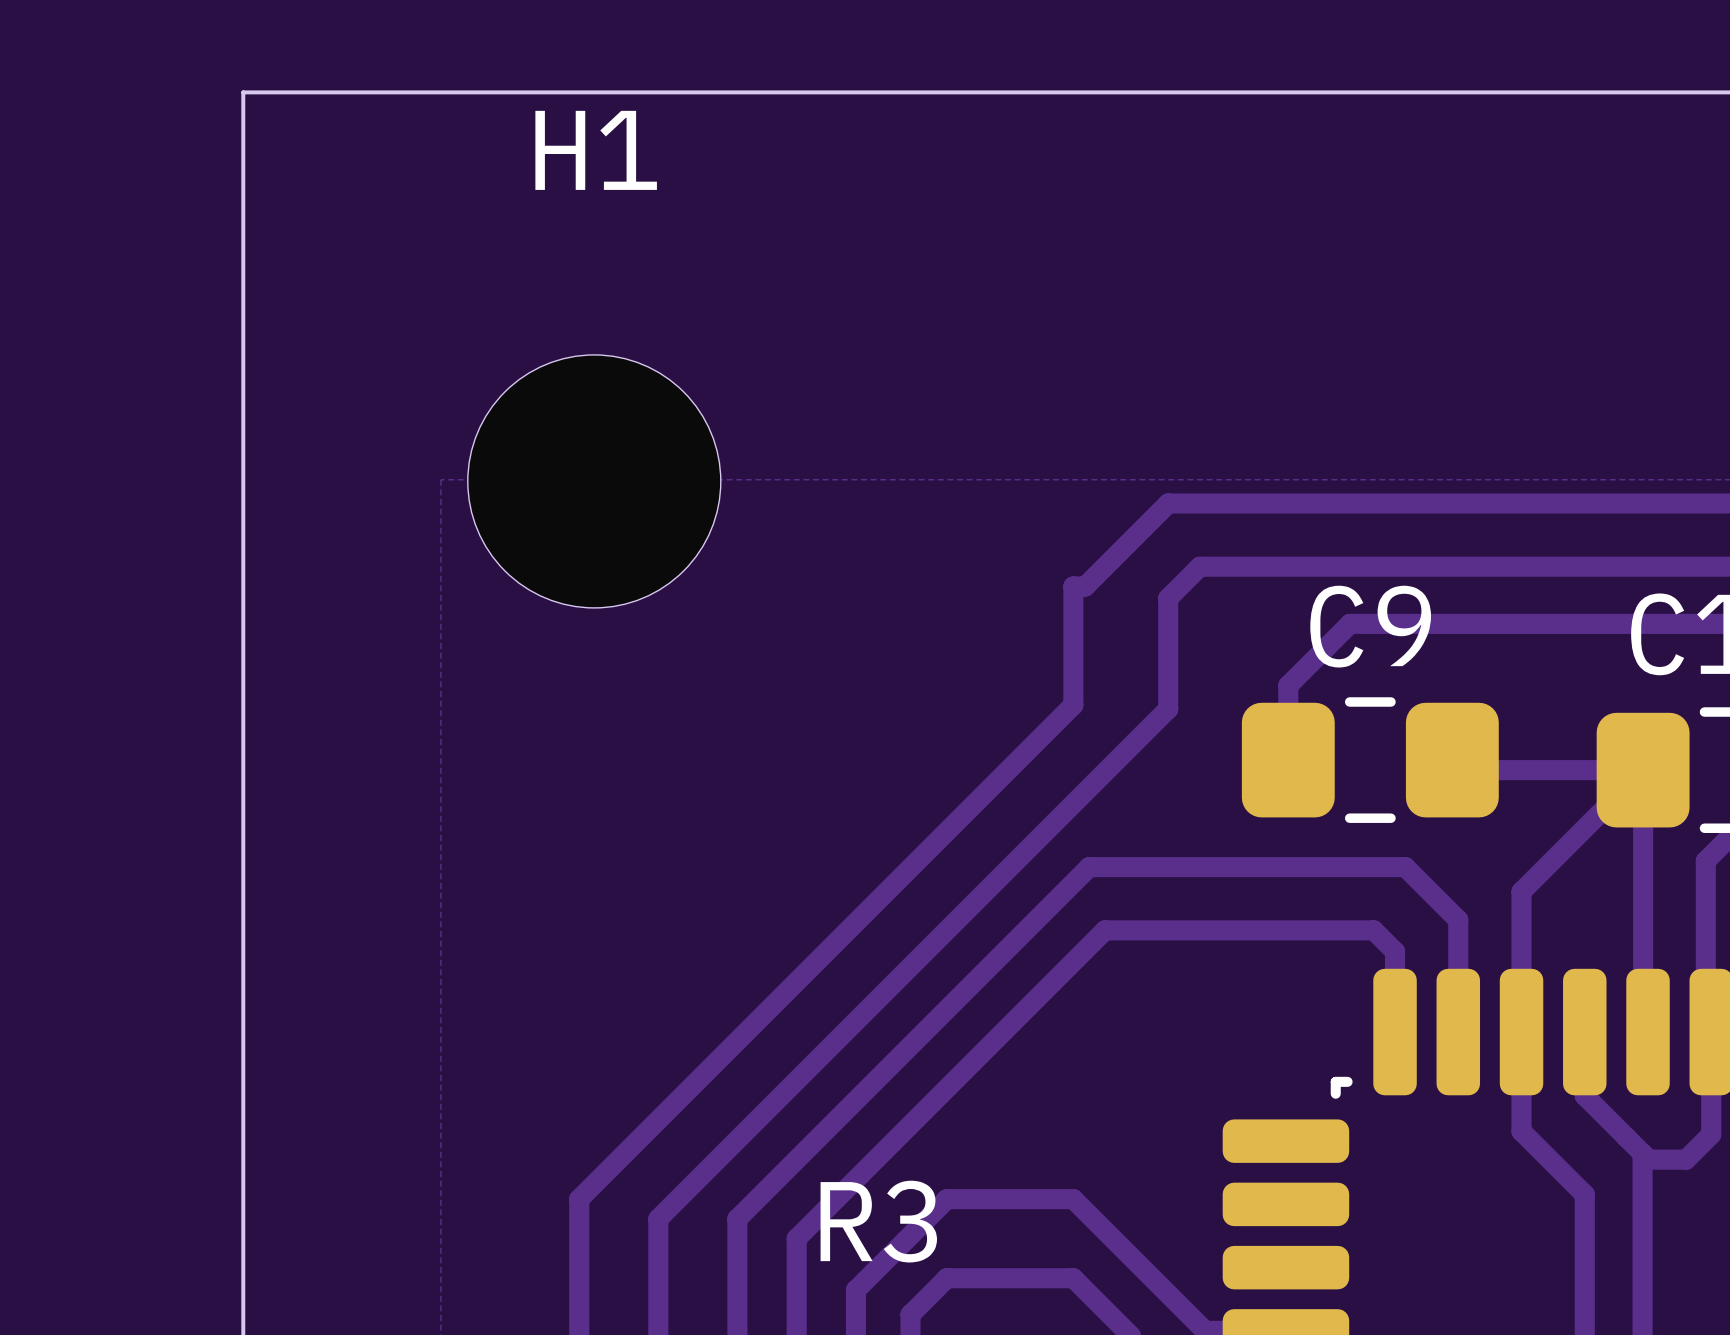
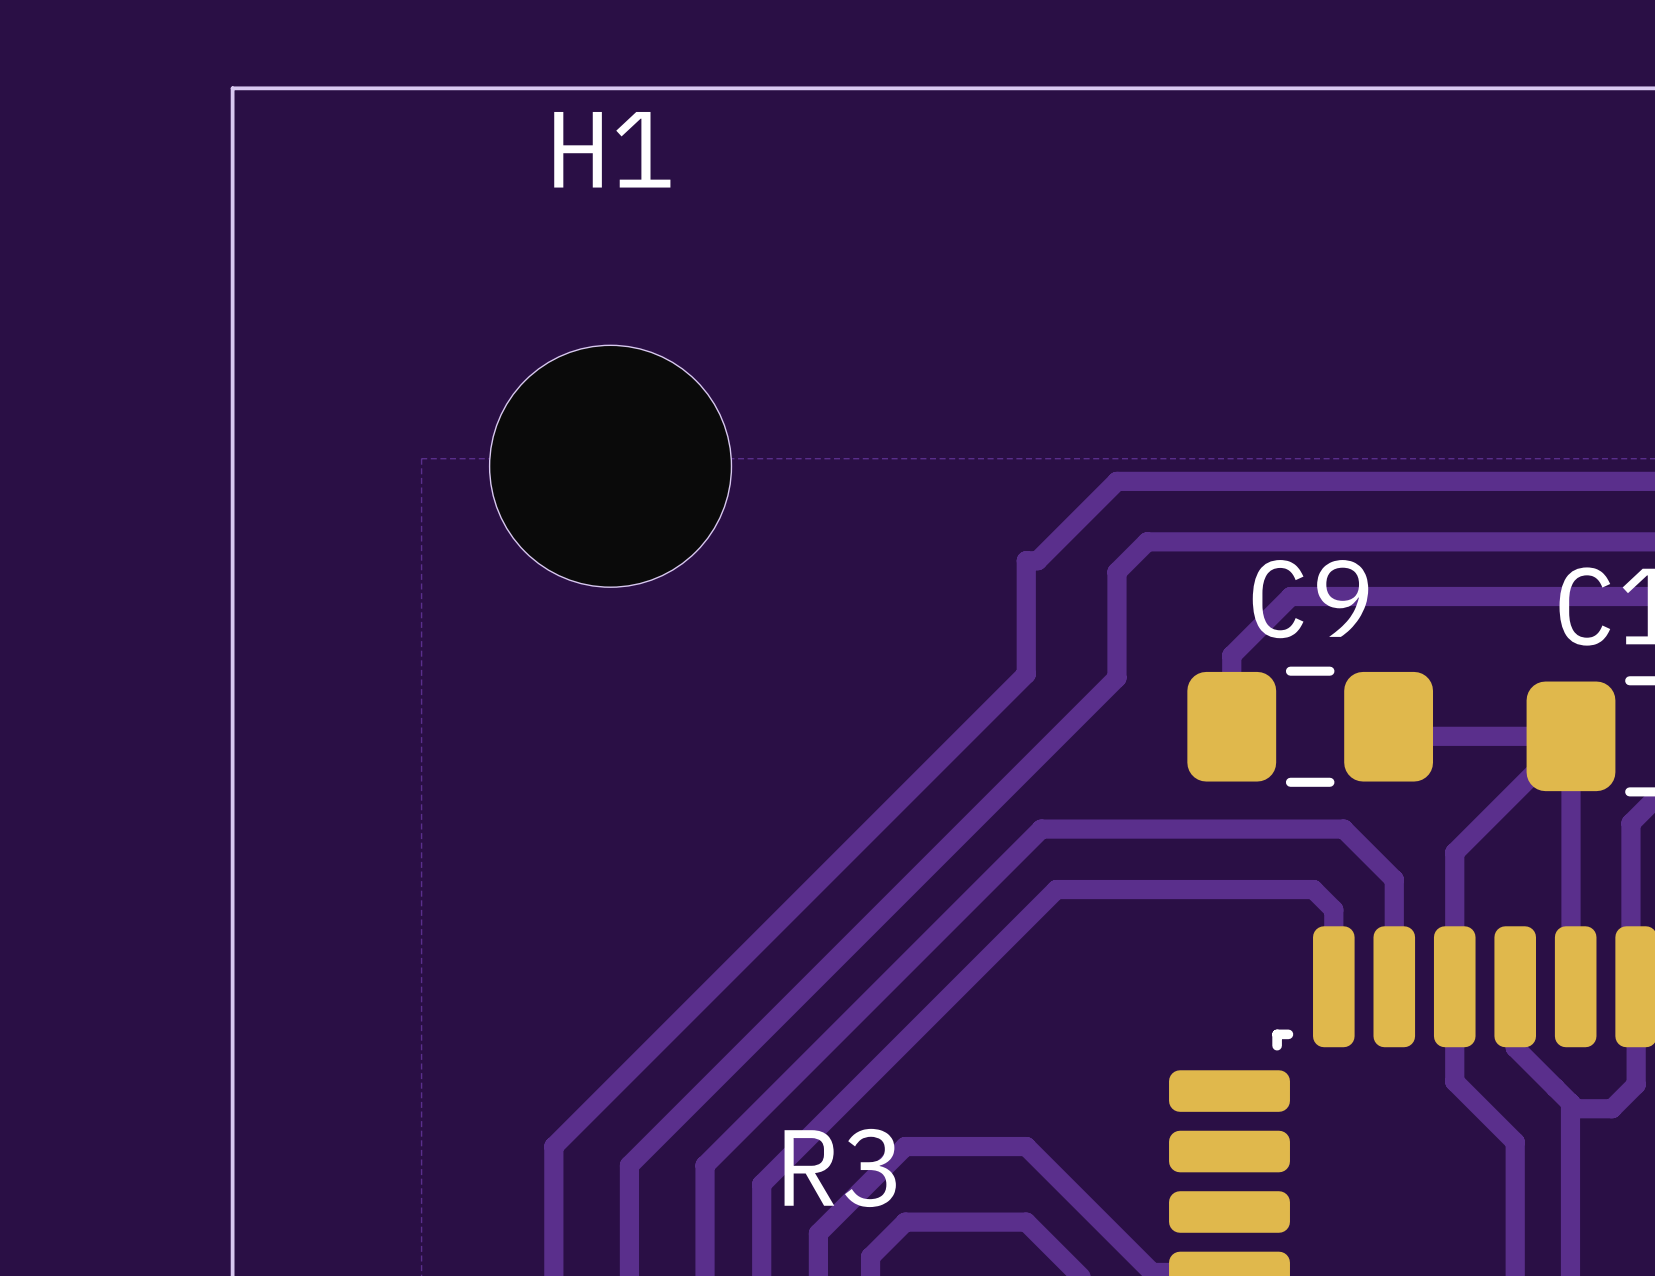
H1 position: (594, 481) -> (610, 466)

